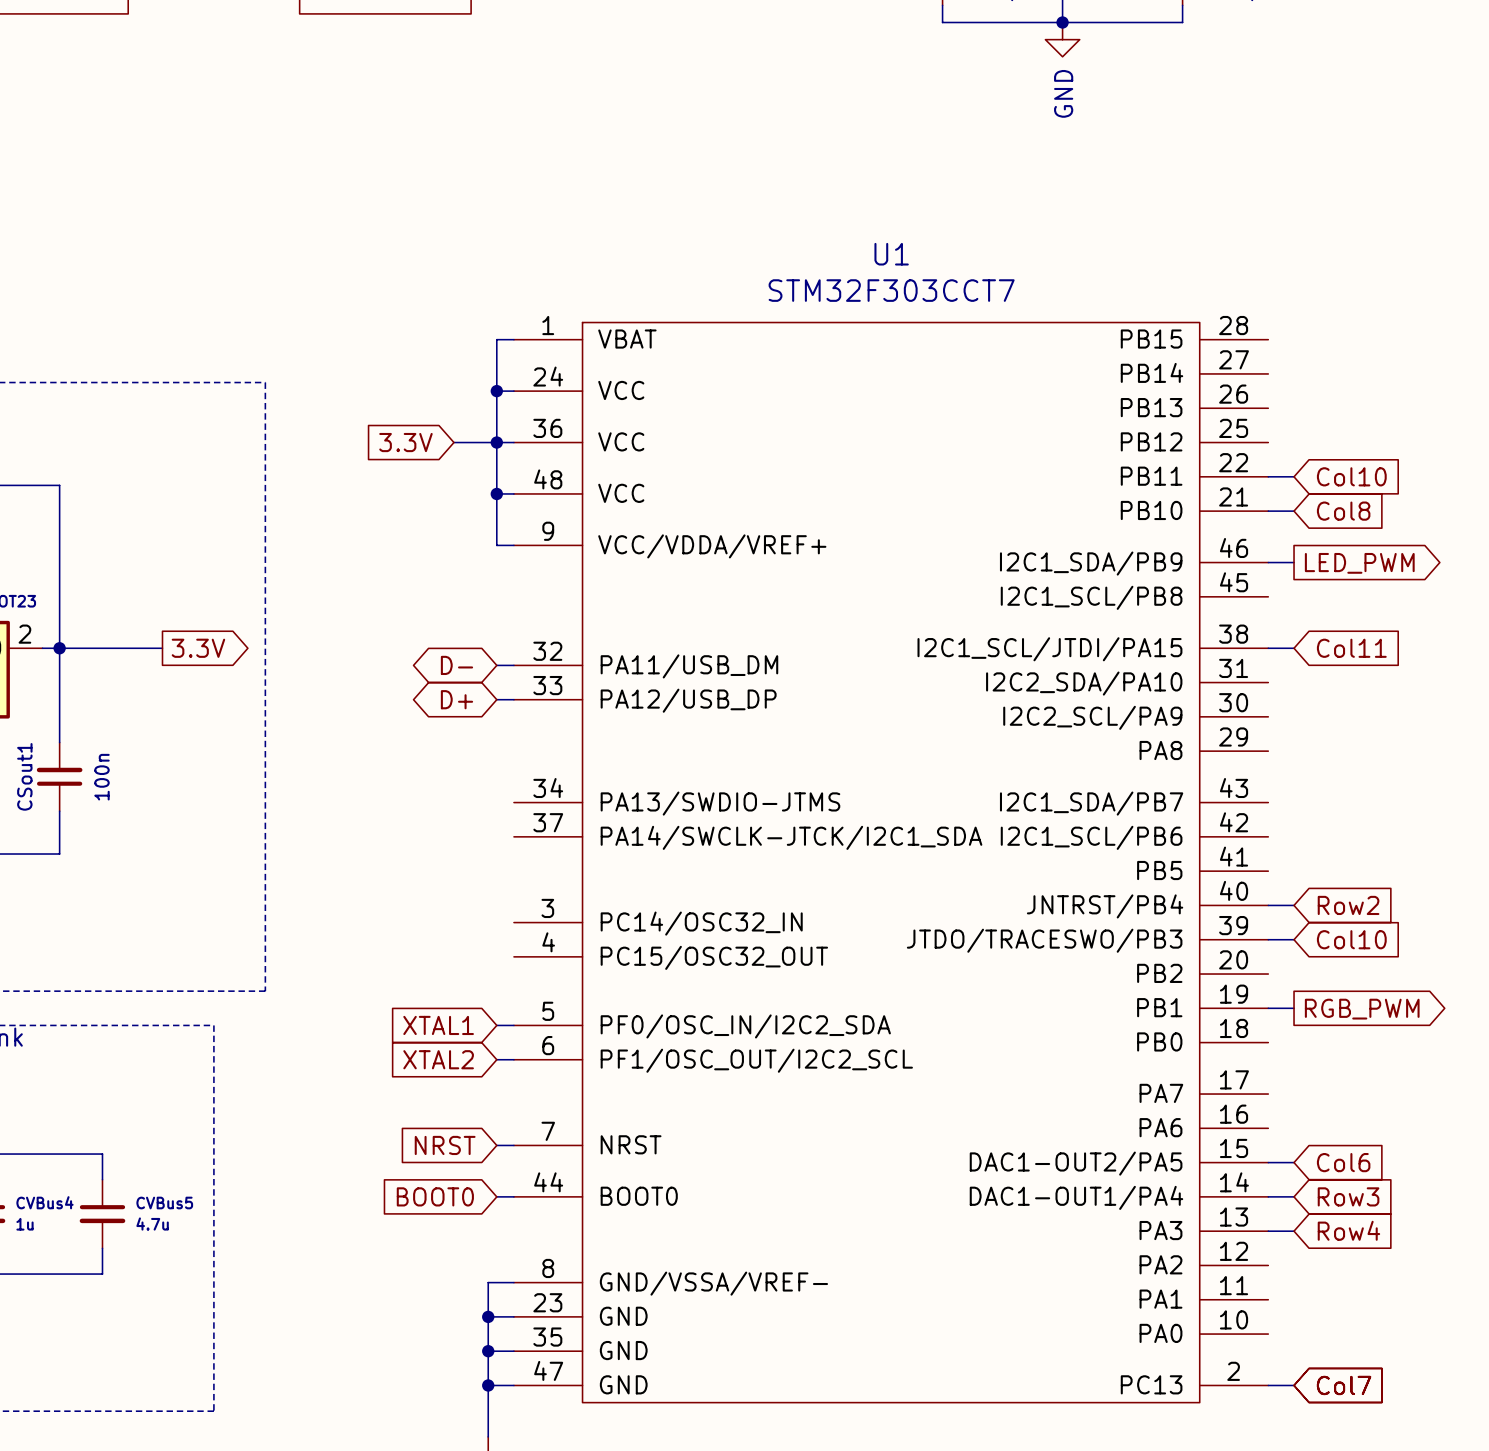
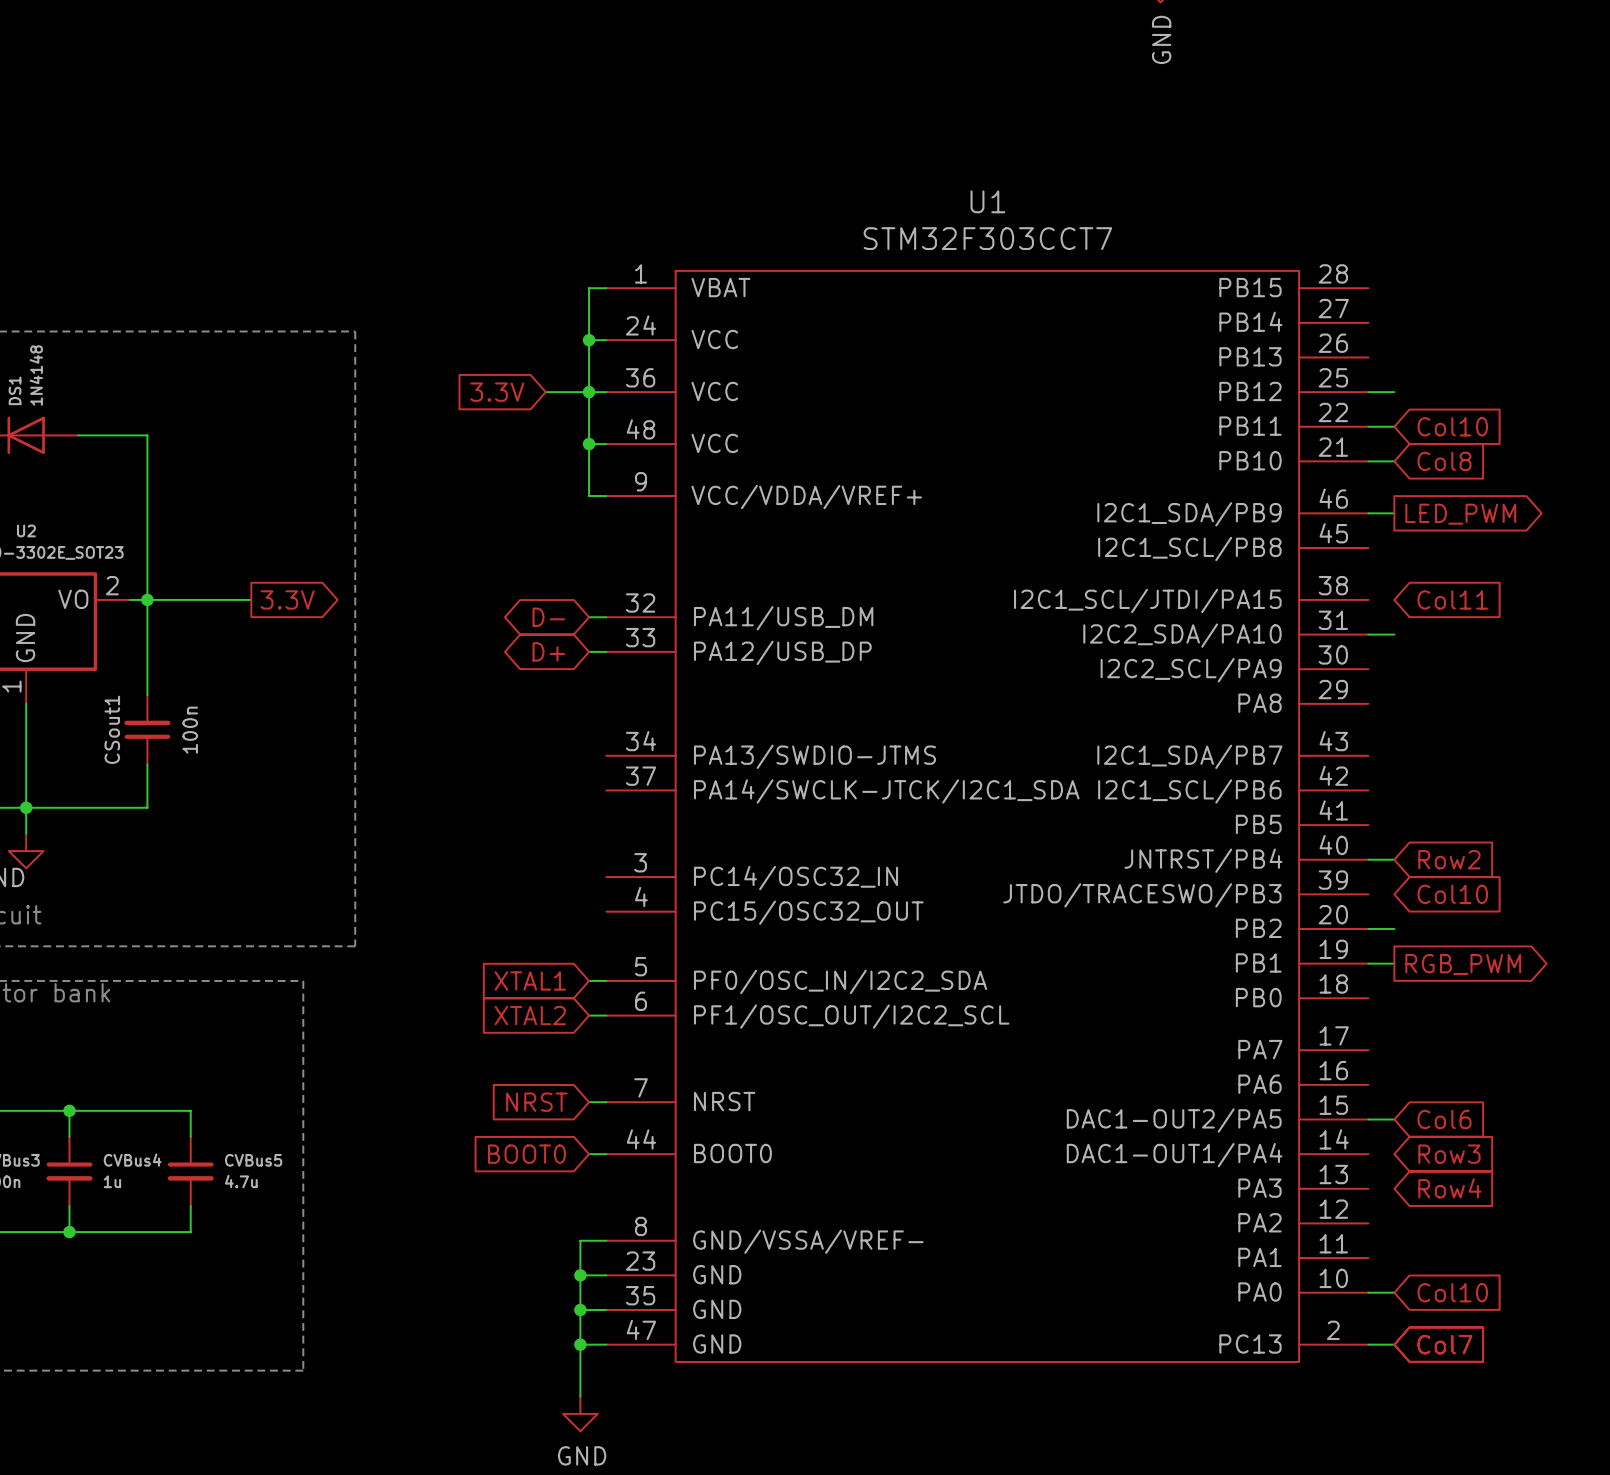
wire: none -> (1368, 392) (1394, 392)
wire: (1268, 648) (1294, 648) -> (1368, 634) (1394, 634)
wire: (1268, 939) (1294, 939) -> (1368, 929) (1394, 929)
wire: (1268, 1196) (1294, 1196) -> none
wire: (1268, 1231) (1294, 1231) -> (1368, 1292) (1394, 1292)
global label: none -> Col10 (1452, 1292)

